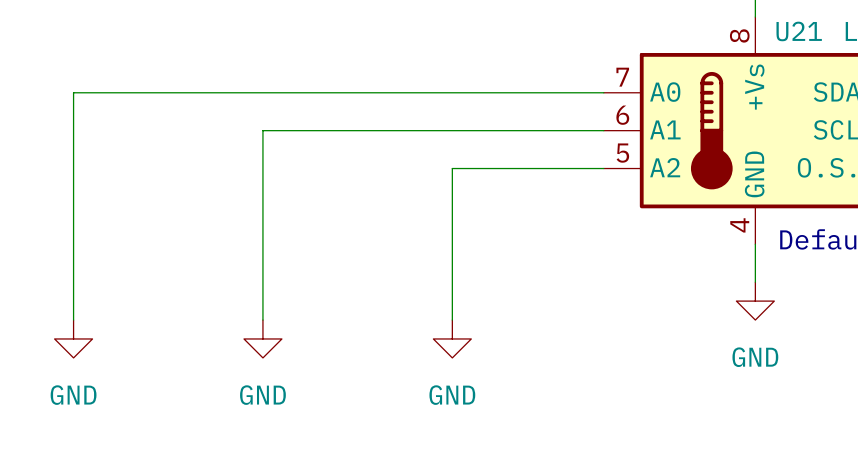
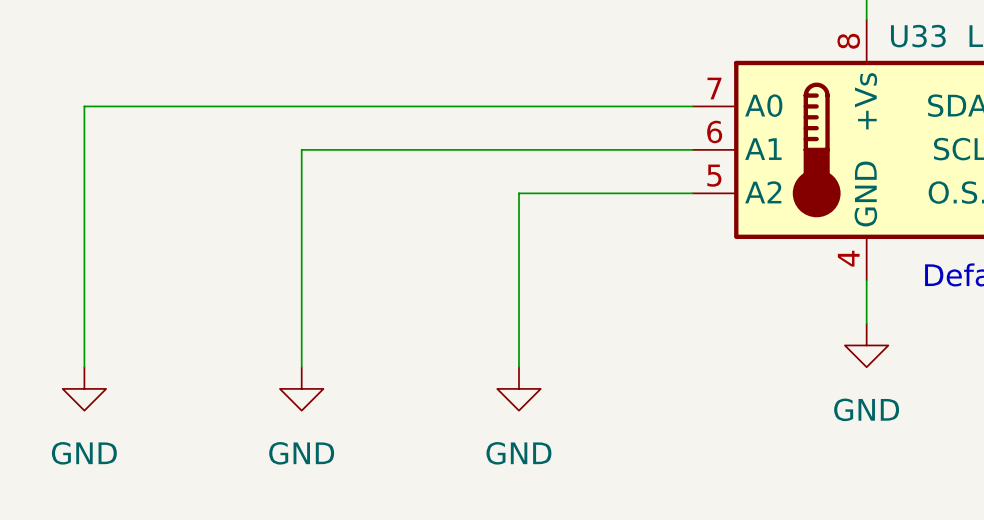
U21 name: U21 (799, 31) -> U33 (918, 36)

